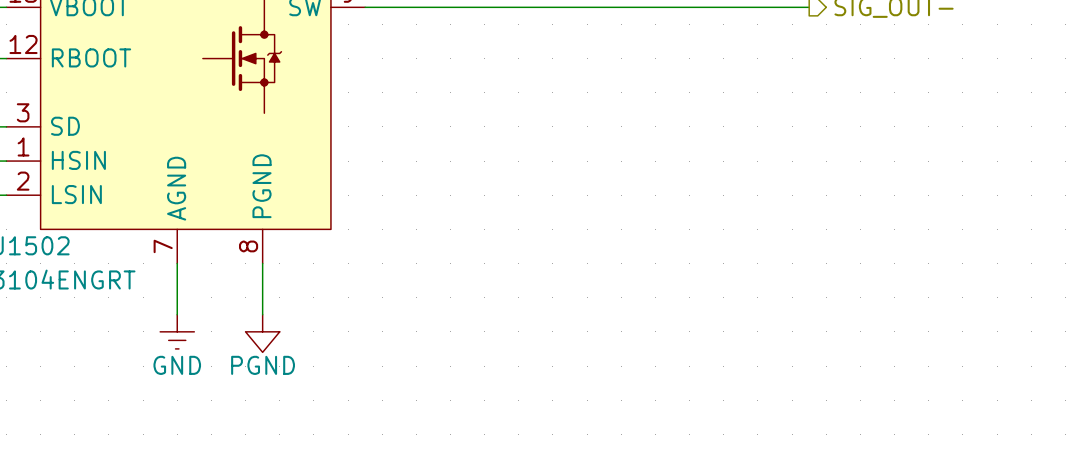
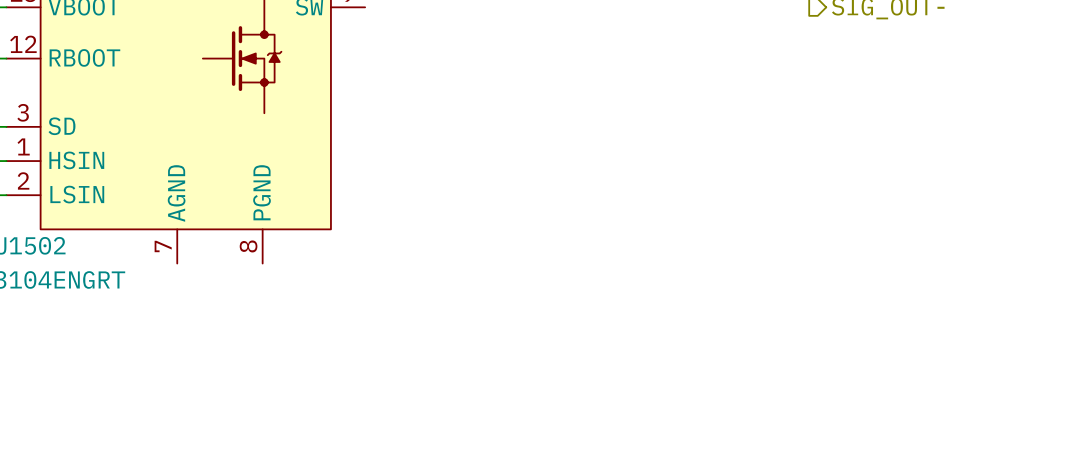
wire: (365, 7) (809, 7) -> none
wire: (177, 263) (177, 314) -> none
wire: (262, 263) (262, 314) -> none
power symbol: GND (177, 331) -> none
power symbol: PGND (262, 333) -> none

